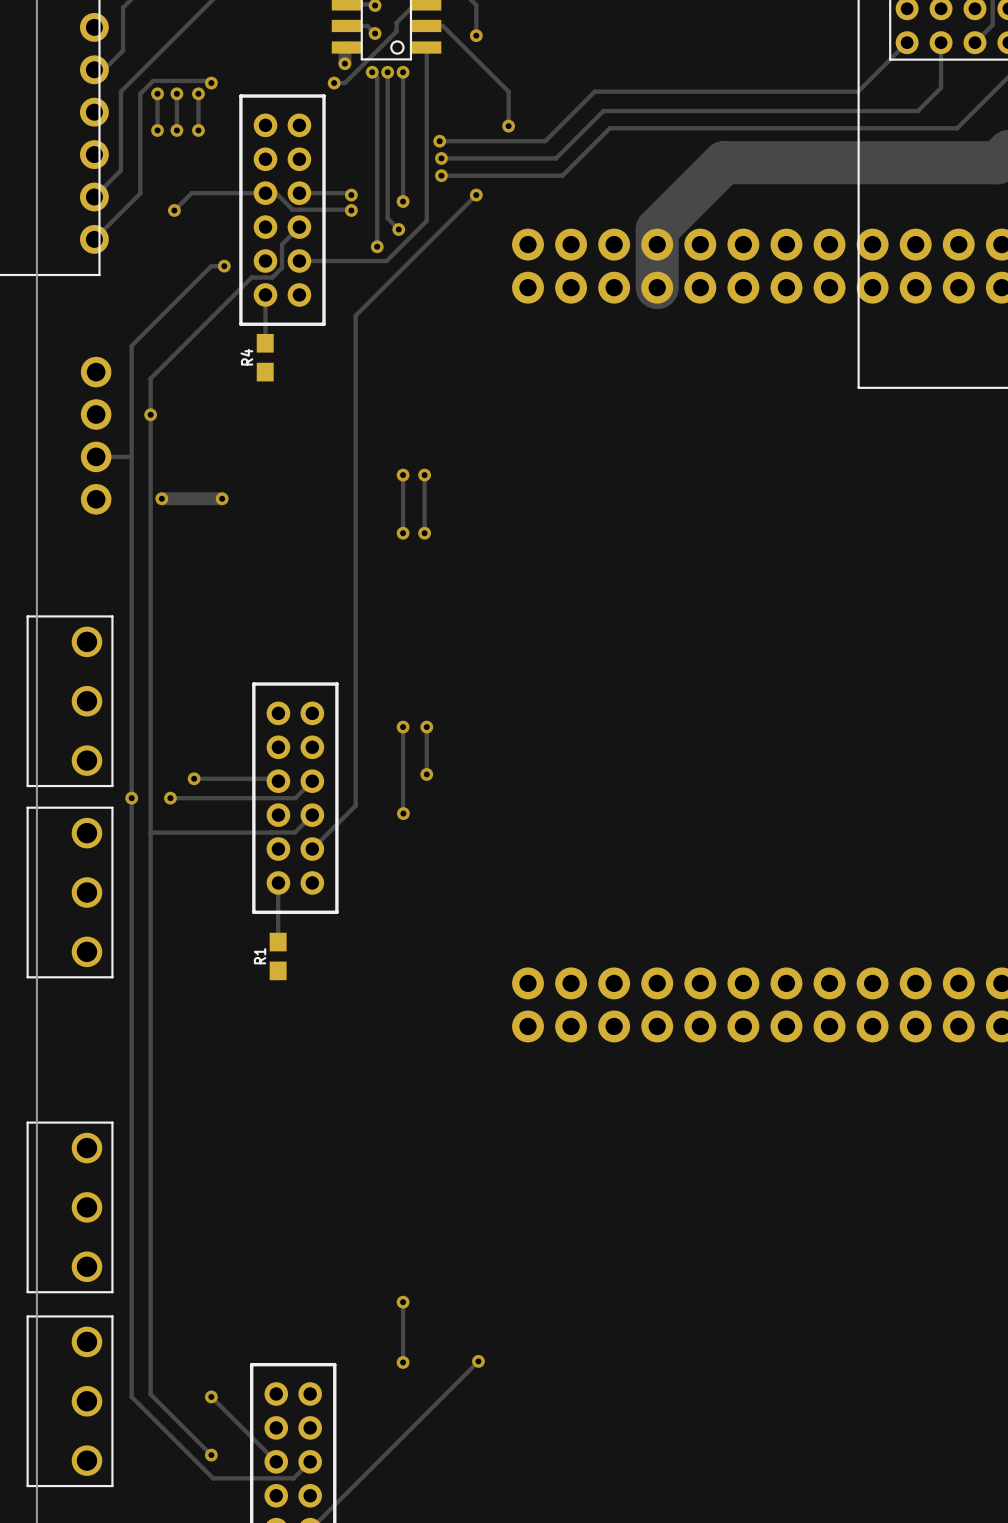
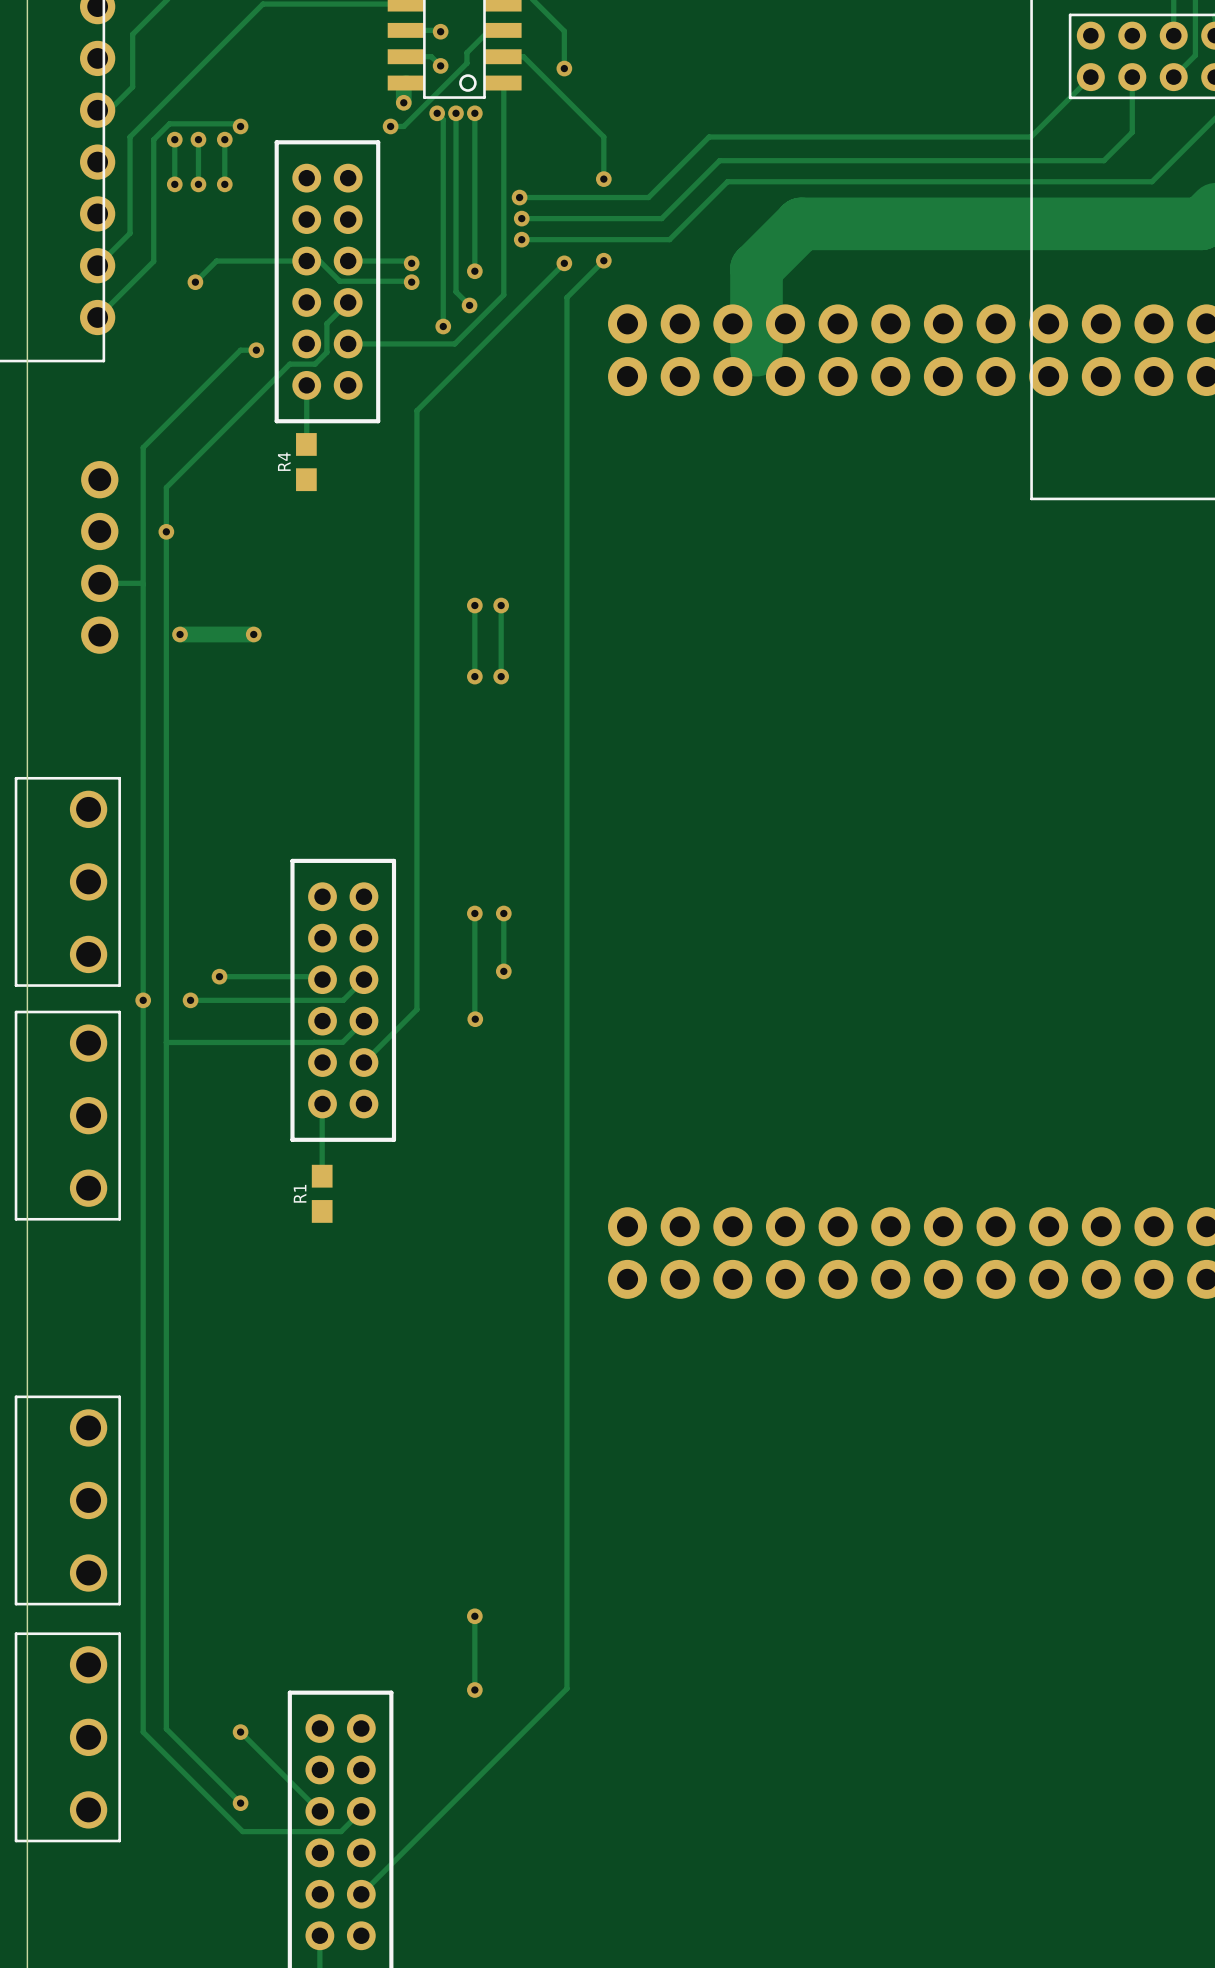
track: (724, 162) (657, 229) (657, 287) -> (867, 223) (801, 223) (756, 268) (756, 350)
track: none -> (603, 260) (566, 297) (566, 1688)
via: none -> (603, 260)
via: (478, 1361) -> none

